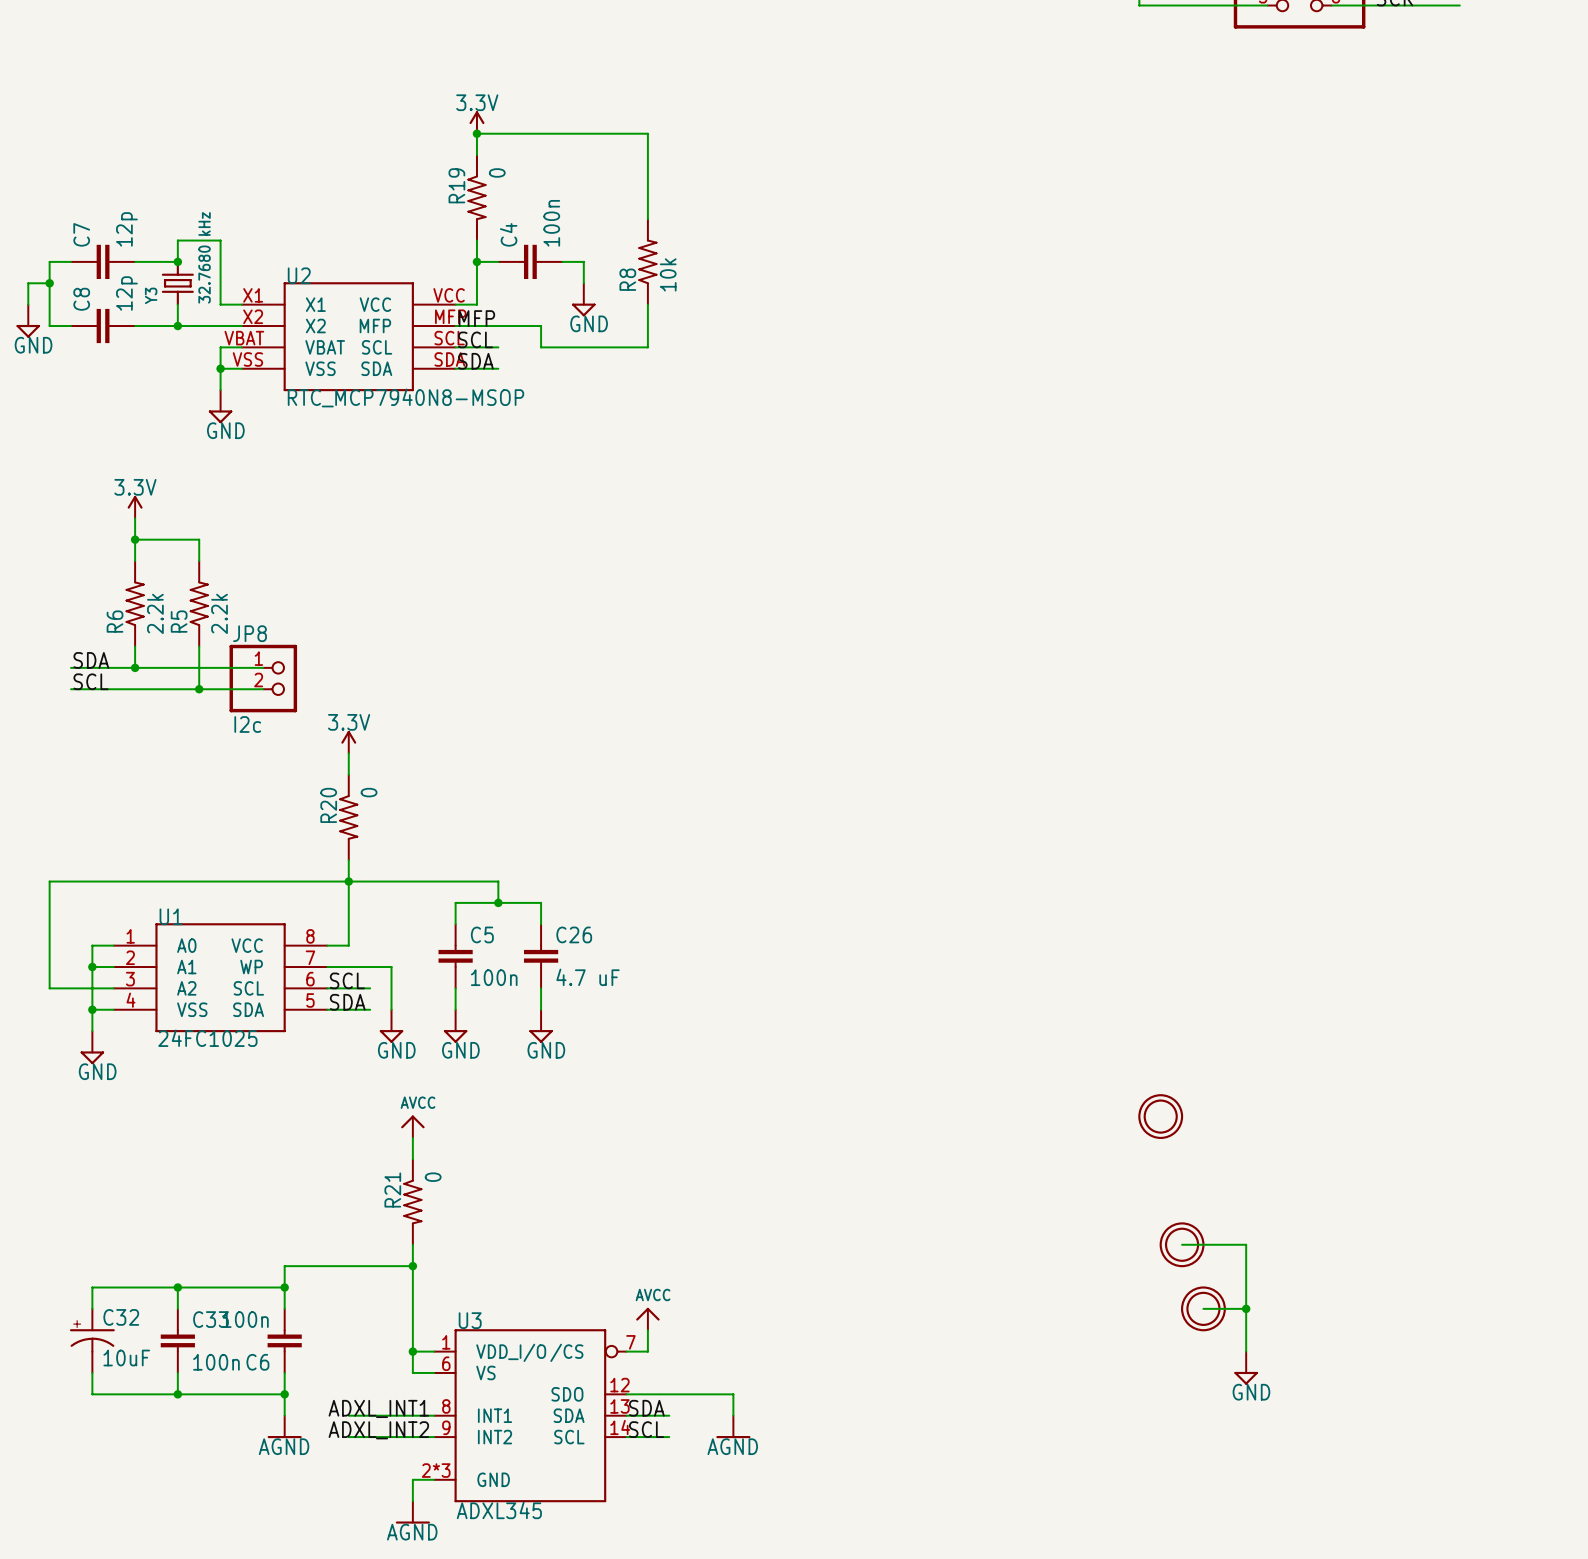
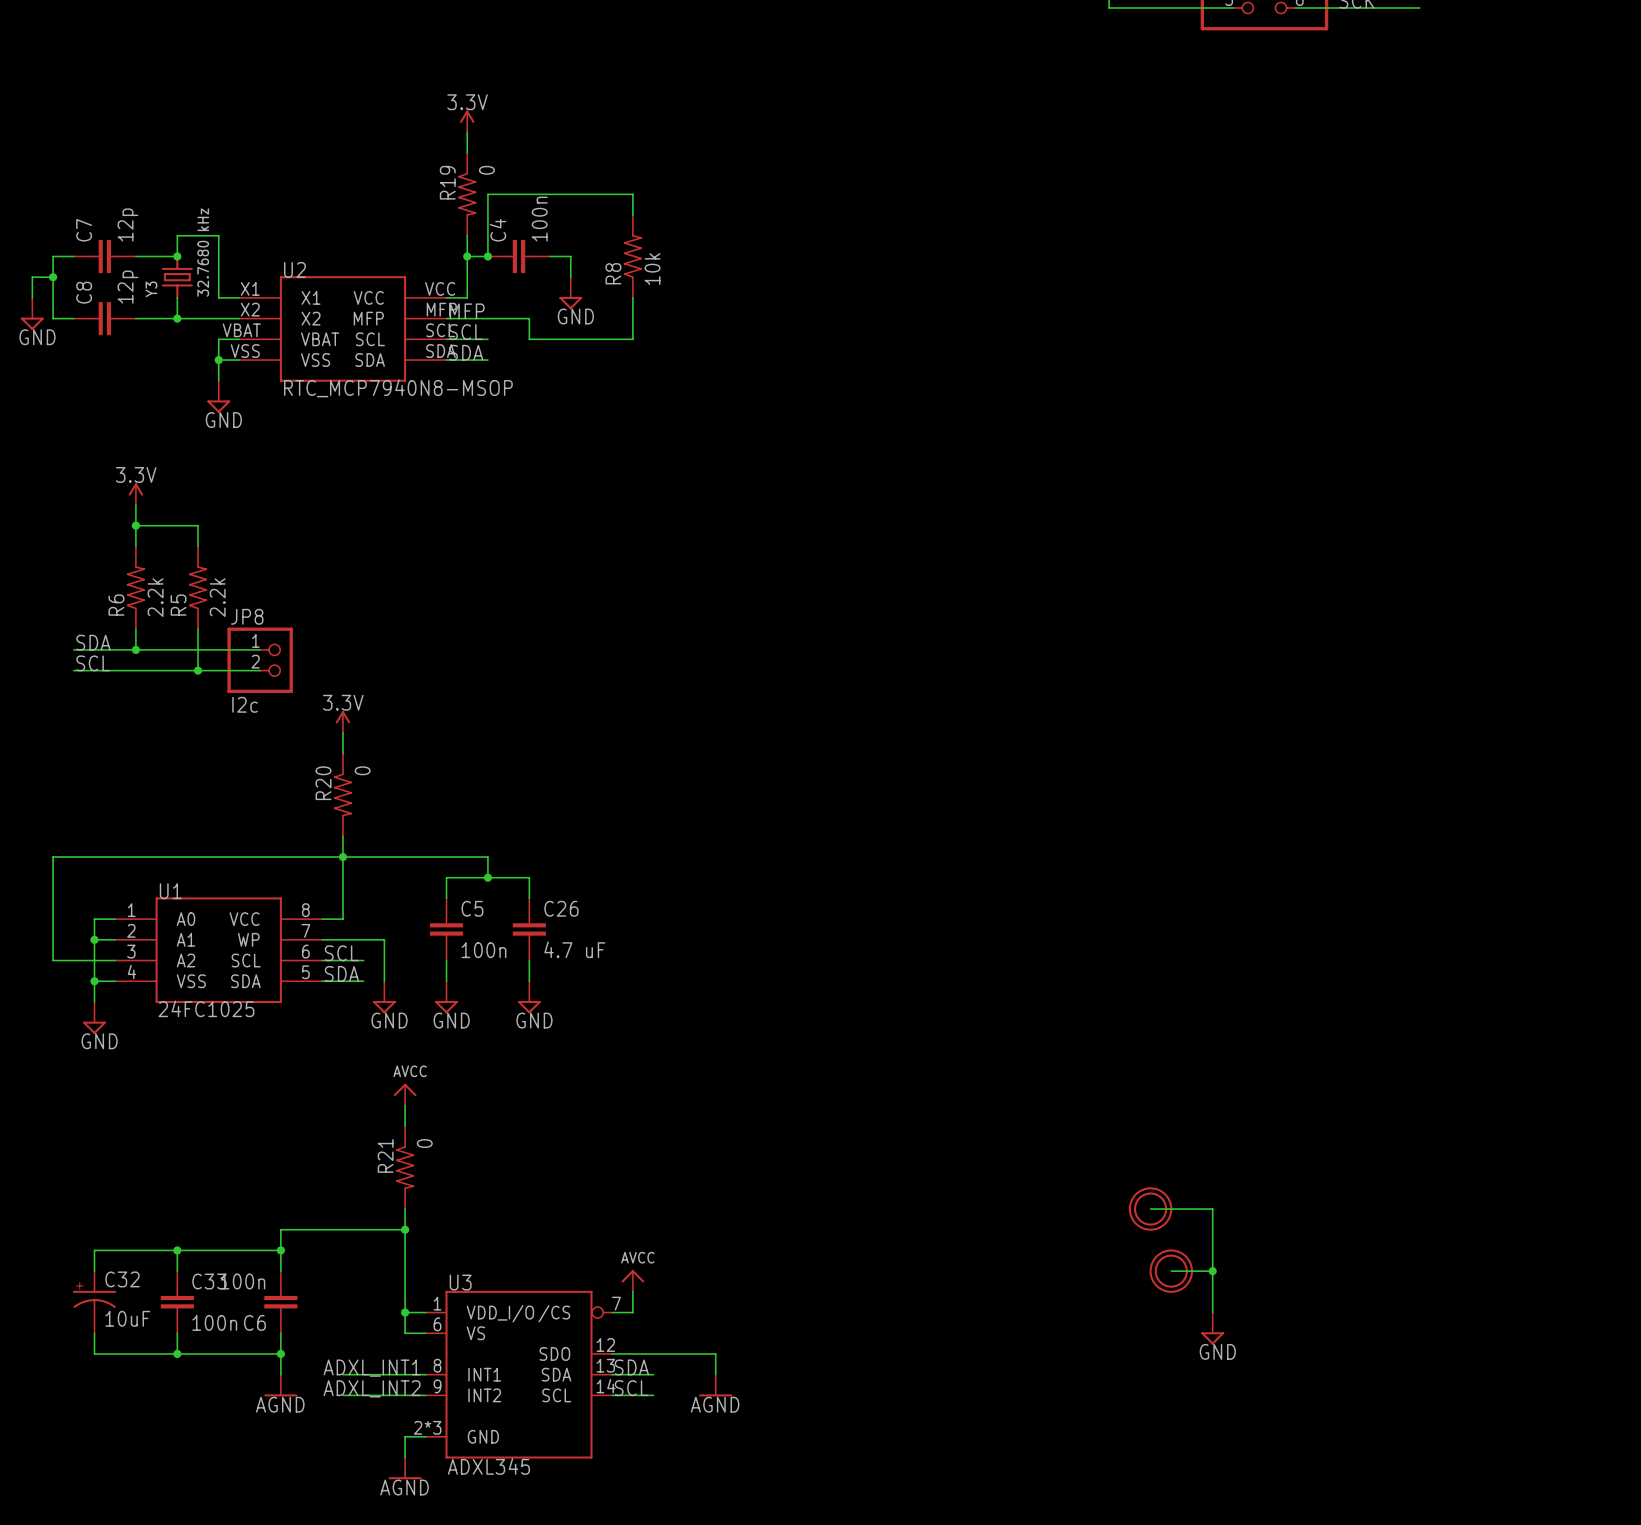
wire: (476, 133) (647, 133) (647, 197) -> (487, 256) (487, 194) (632, 194)
junction: (476, 133) -> none
junction: none -> (487, 256)
part: (1160, 1116) -> none

